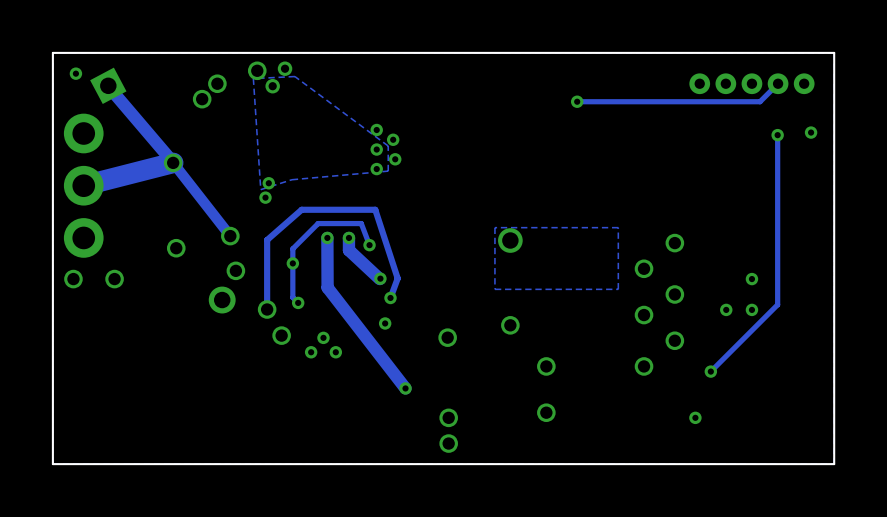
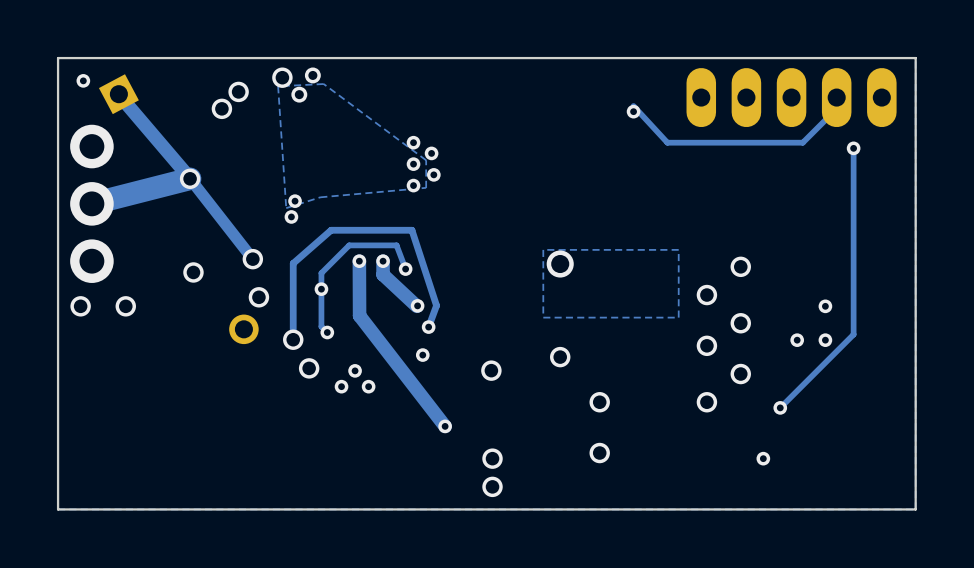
part: (751, 83) -> none
track: (778, 83) (760, 101) (577, 101) -> none
part: none -> (791, 97)
track: none -> (836, 97) (836, 108) (802, 142) (667, 142) (633, 106)
via: (811, 132) -> none

